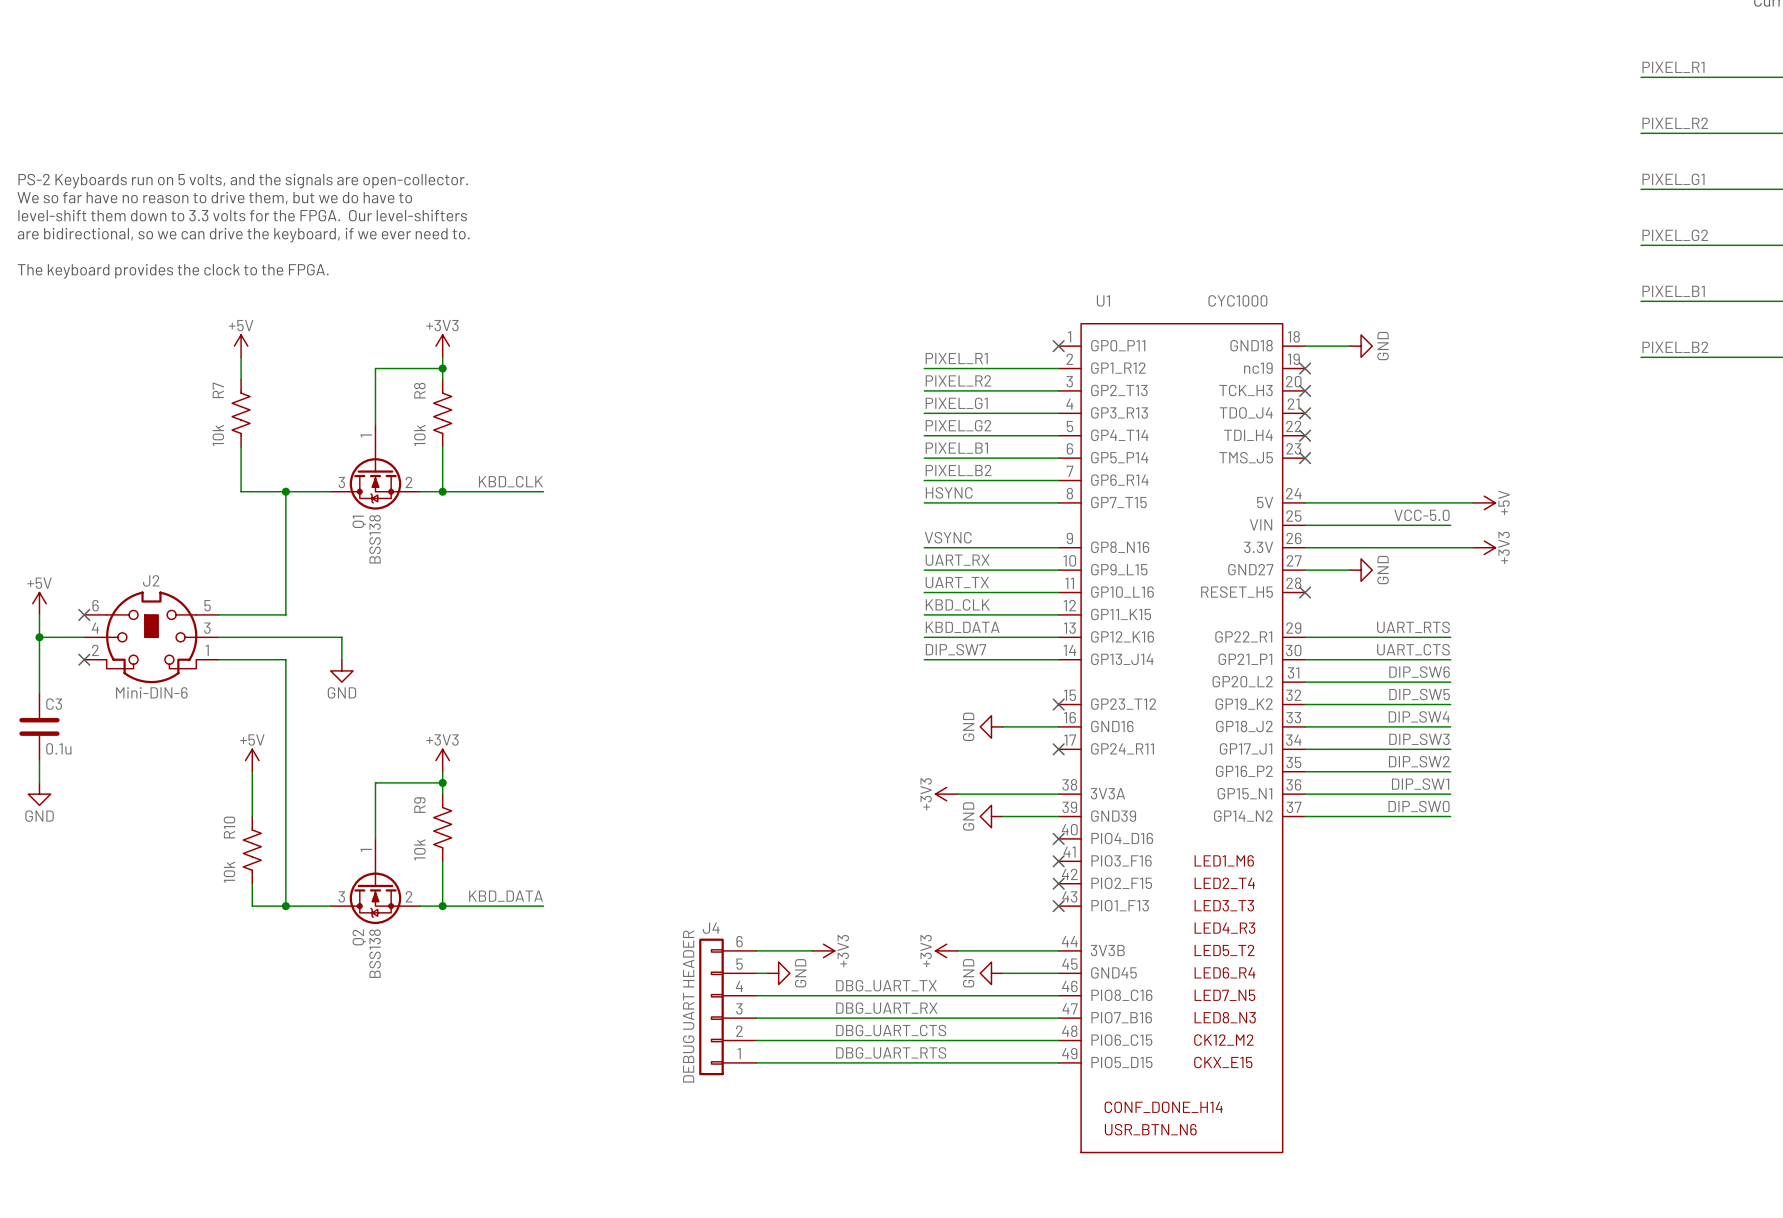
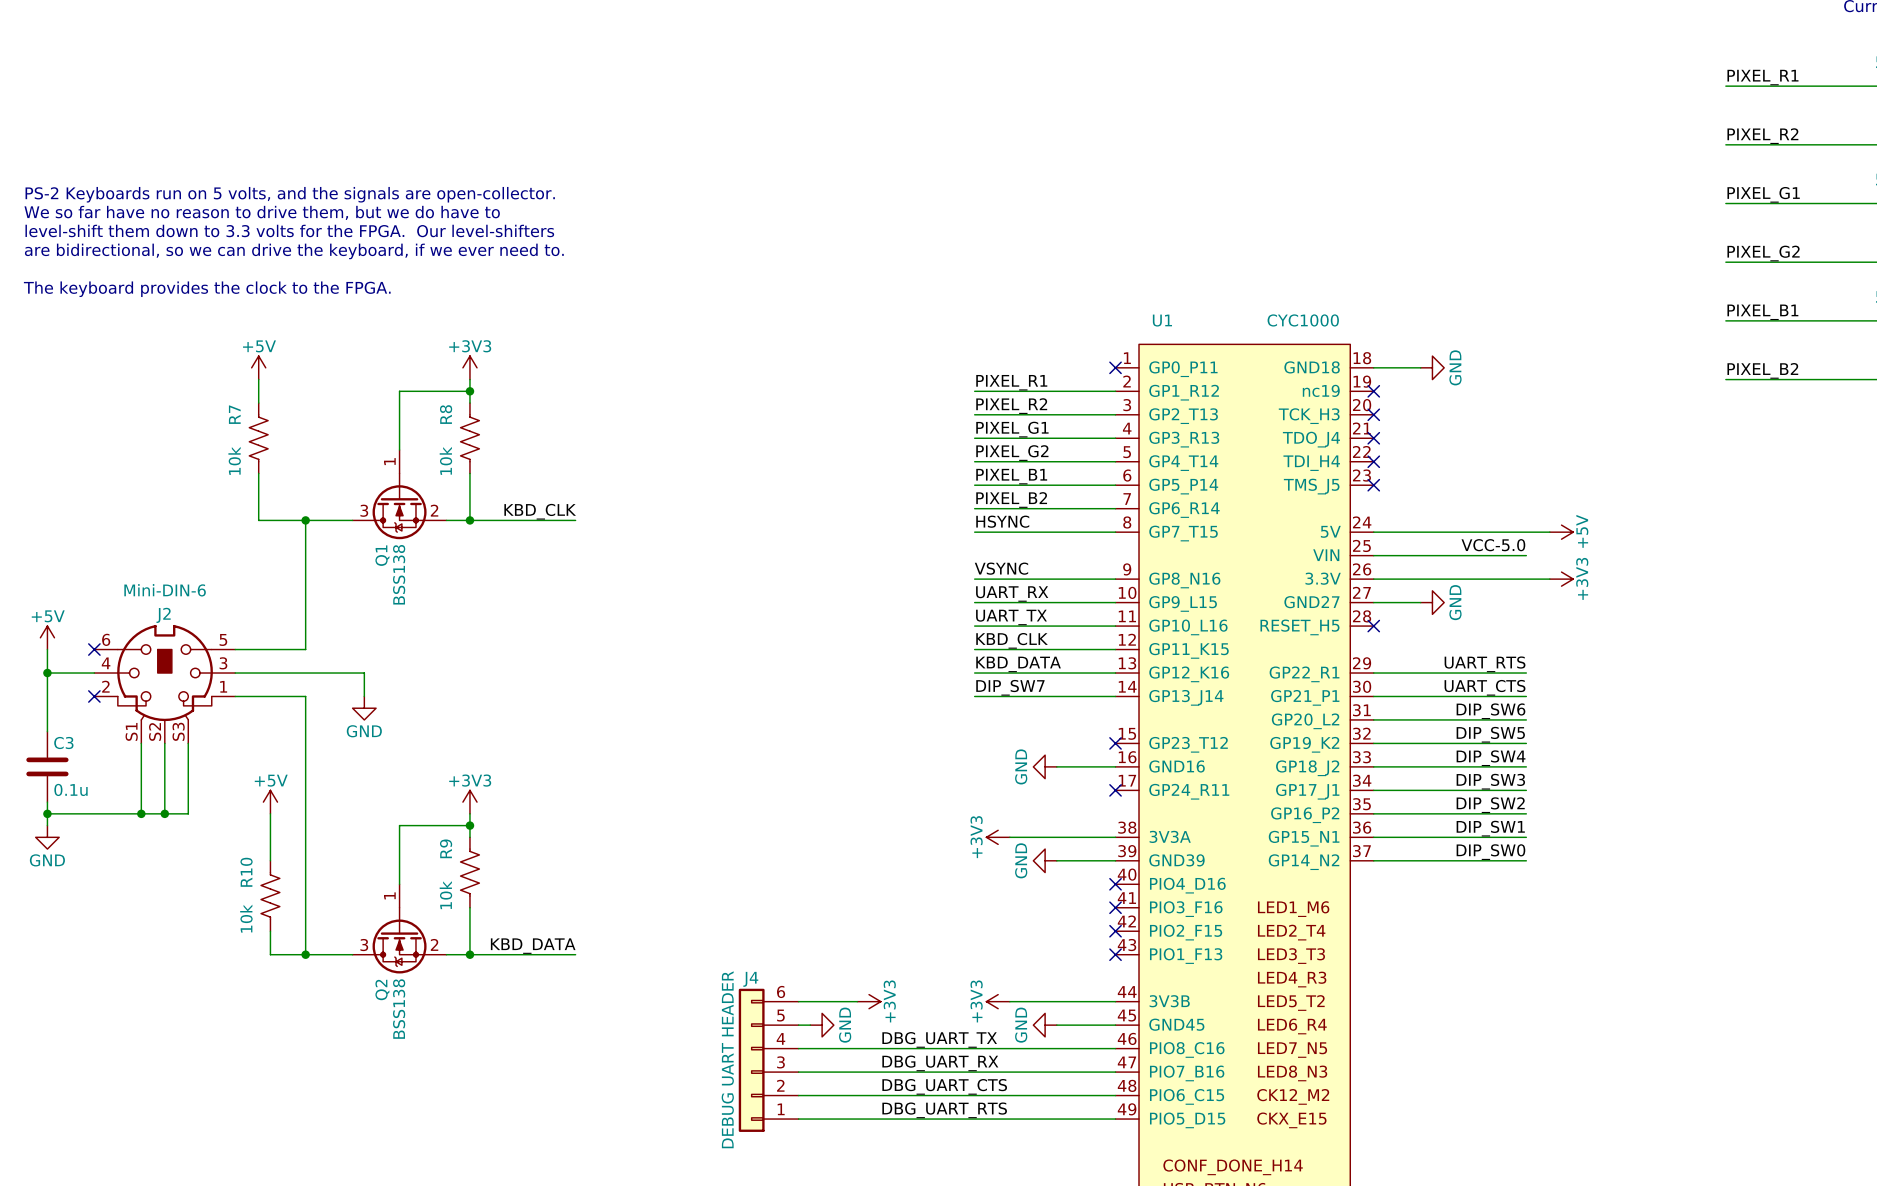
J2 symbol: [84, 591, 219, 684] -> [94, 624, 236, 744]
J2 value position: Mini-DIN-6 (151, 692) -> Mini-DIN-6 (165, 590)
wire: none -> (141, 743) (141, 813)
wire: none -> (164, 743) (164, 813)
wire: none -> (188, 743) (188, 813) (47, 813)
junction: none -> (47, 813)
junction: none -> (141, 813)
junction: none -> (164, 813)

